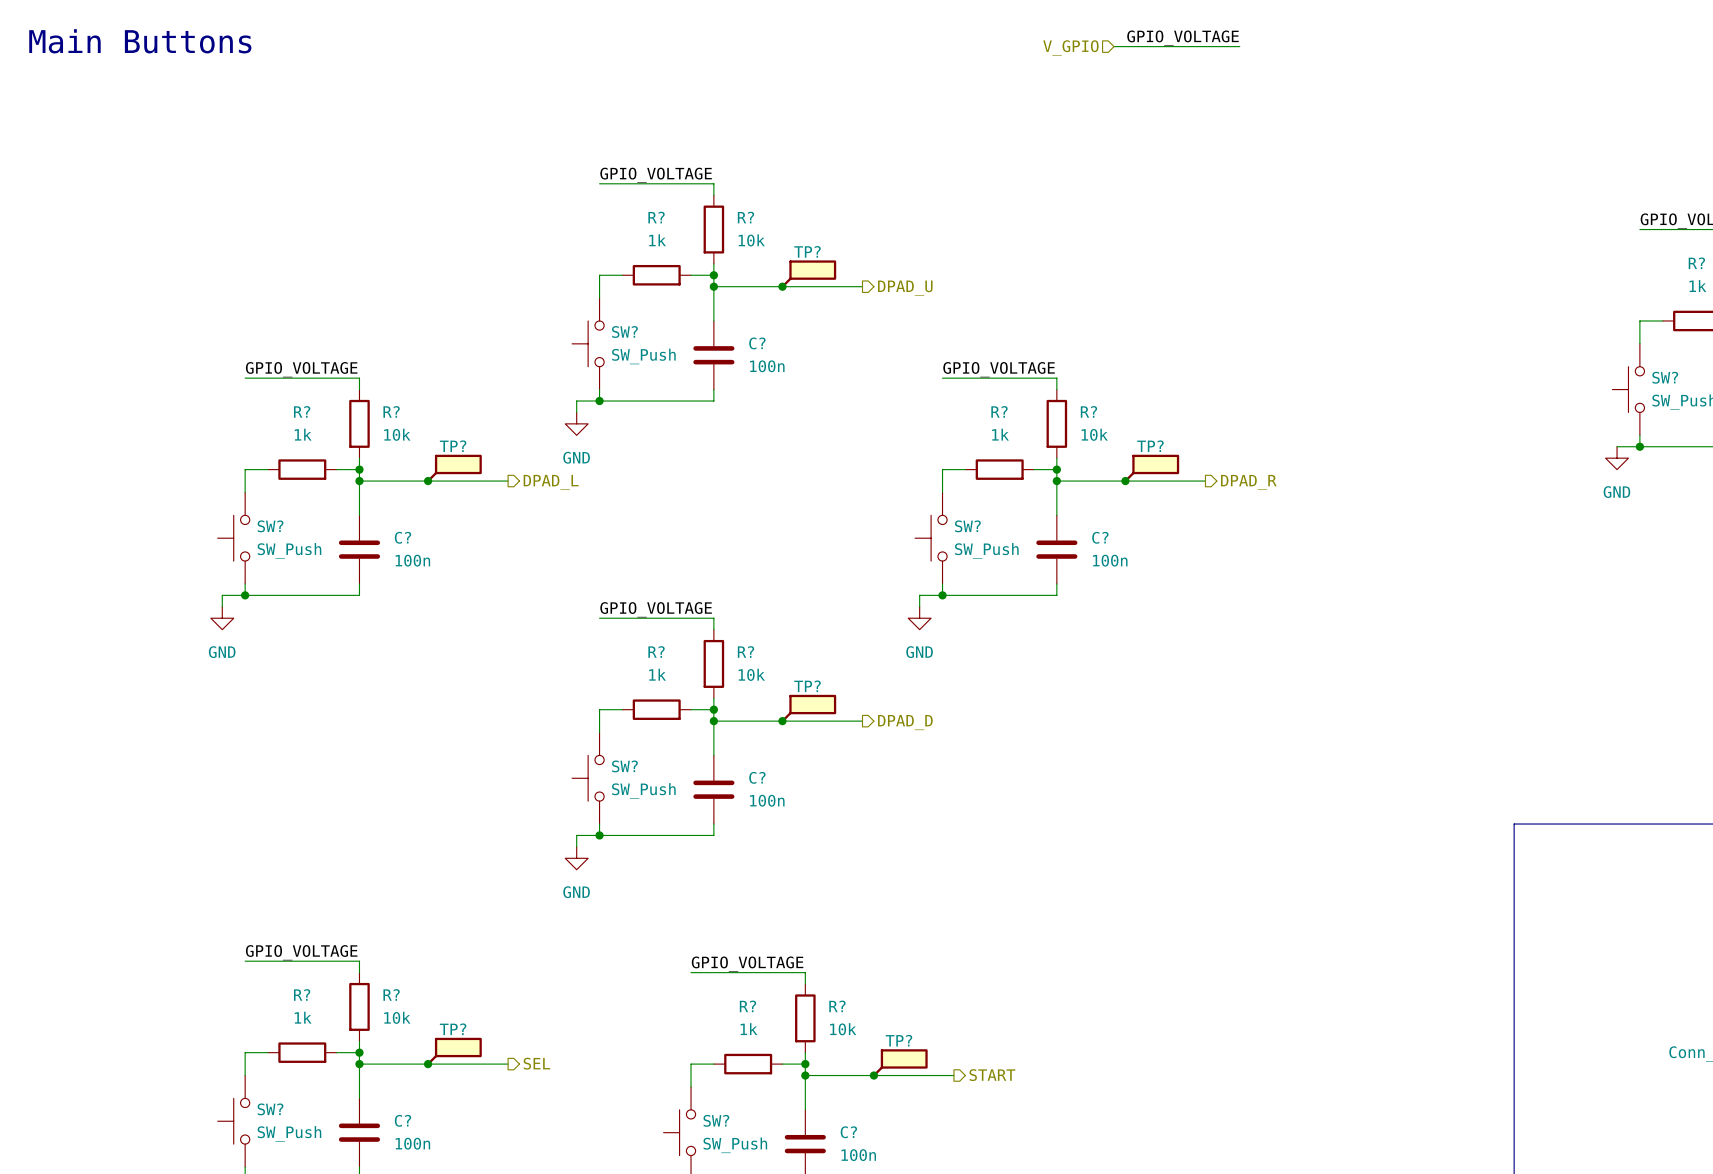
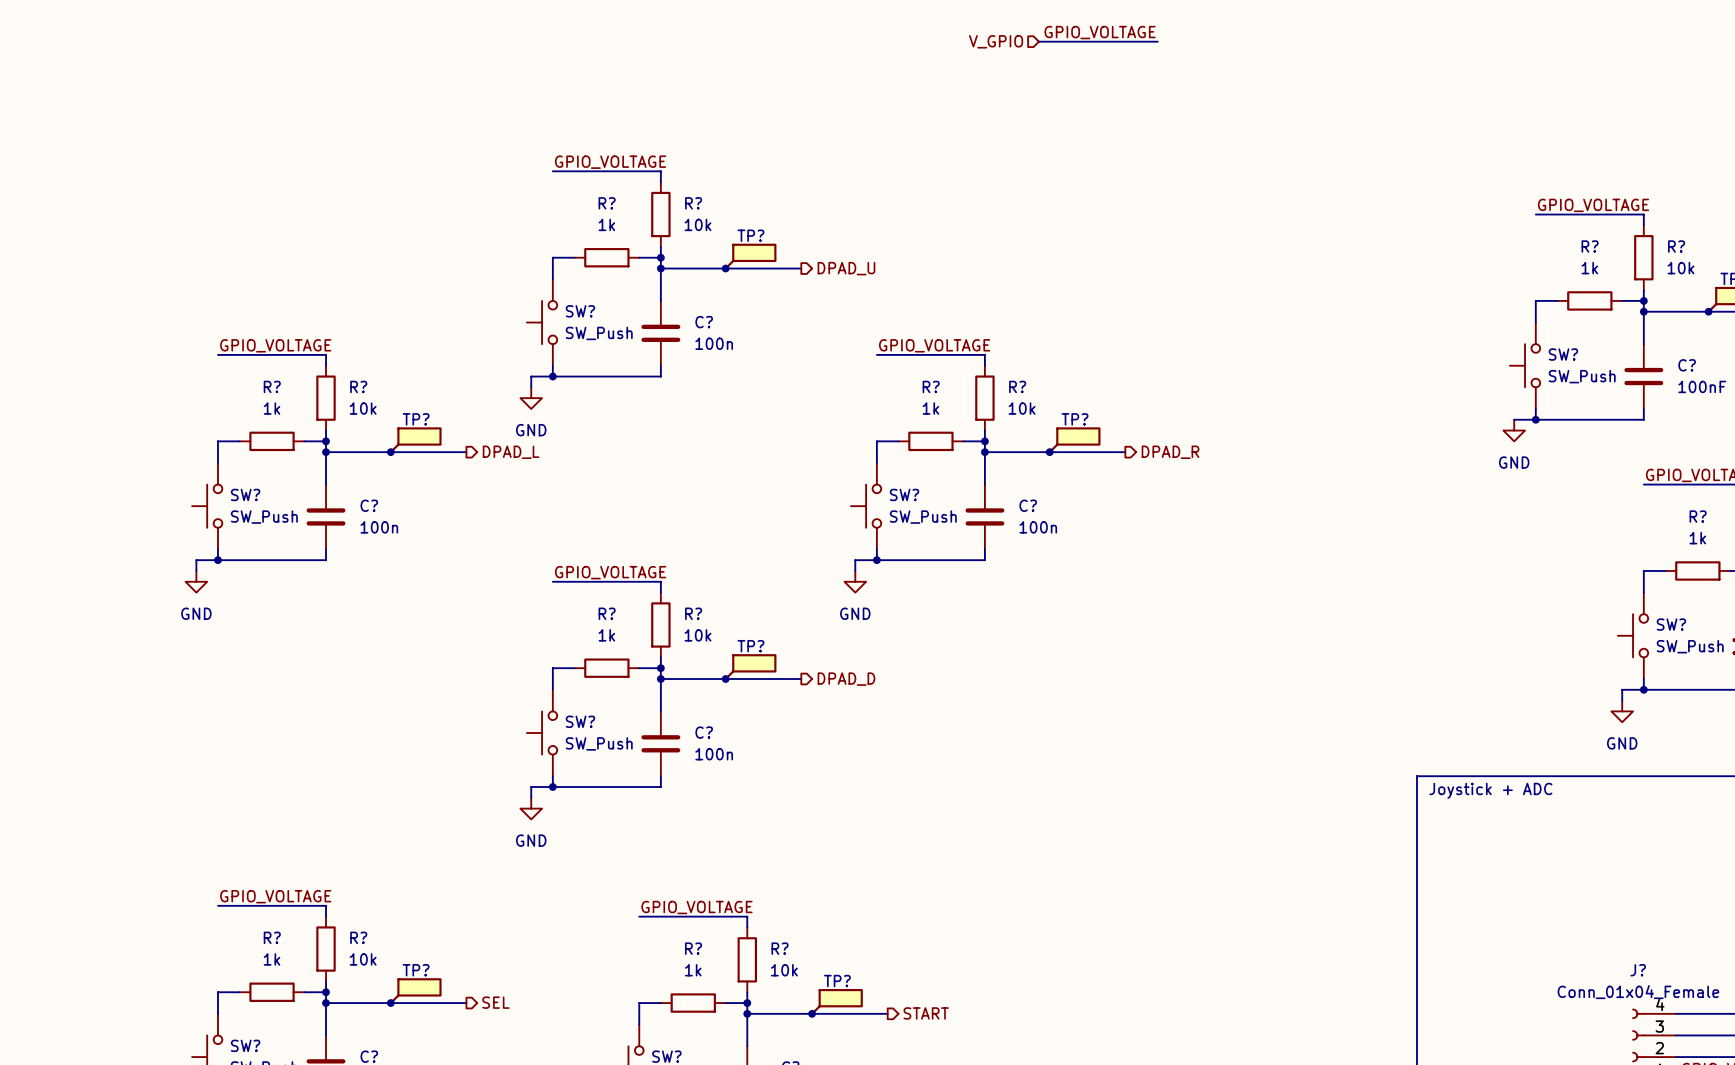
text: Main Buttons (140, 41) -> none
text: none -> Joystick + ADC (1490, 790)

